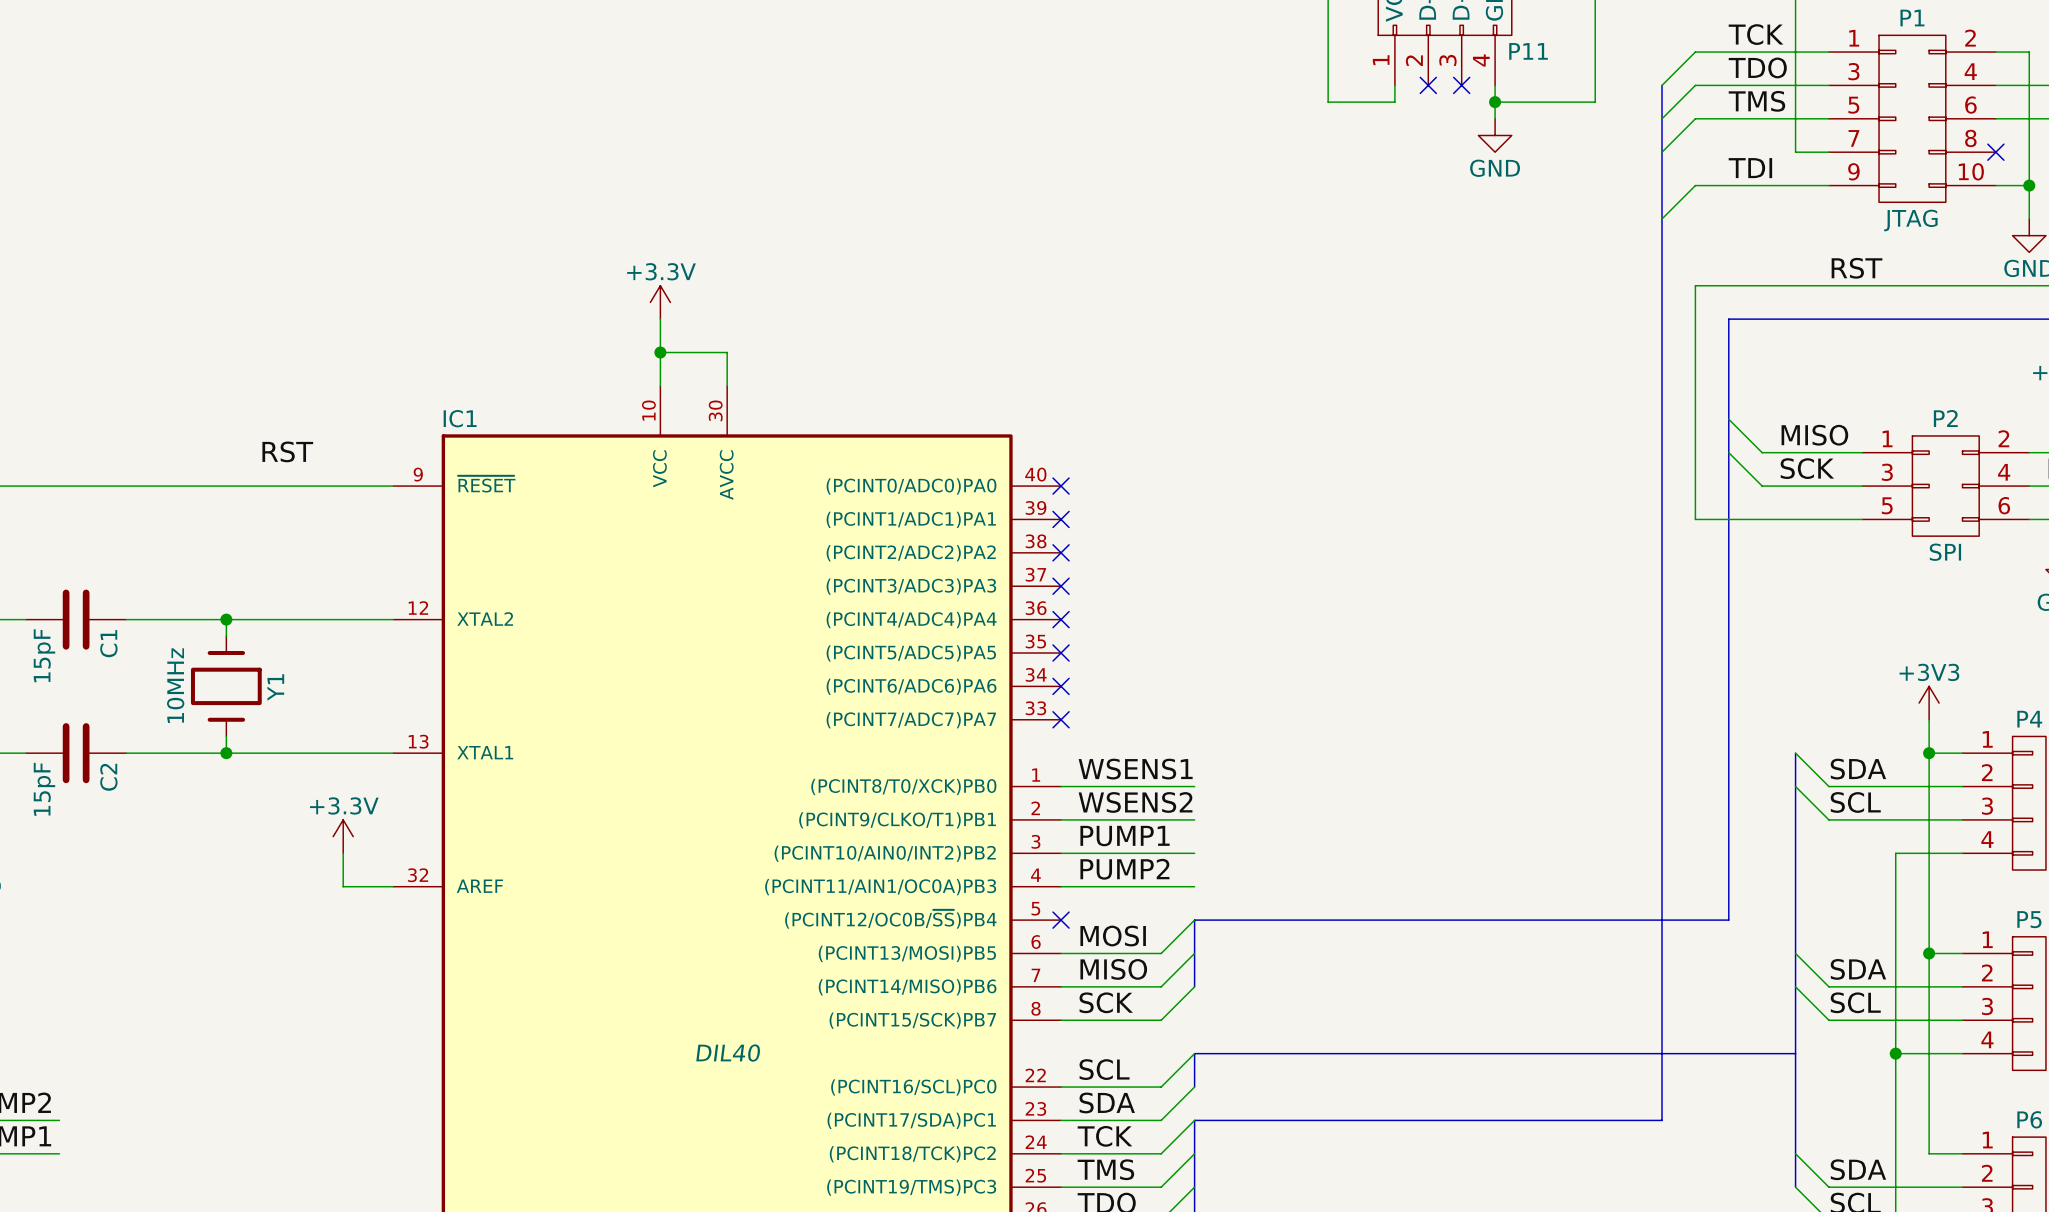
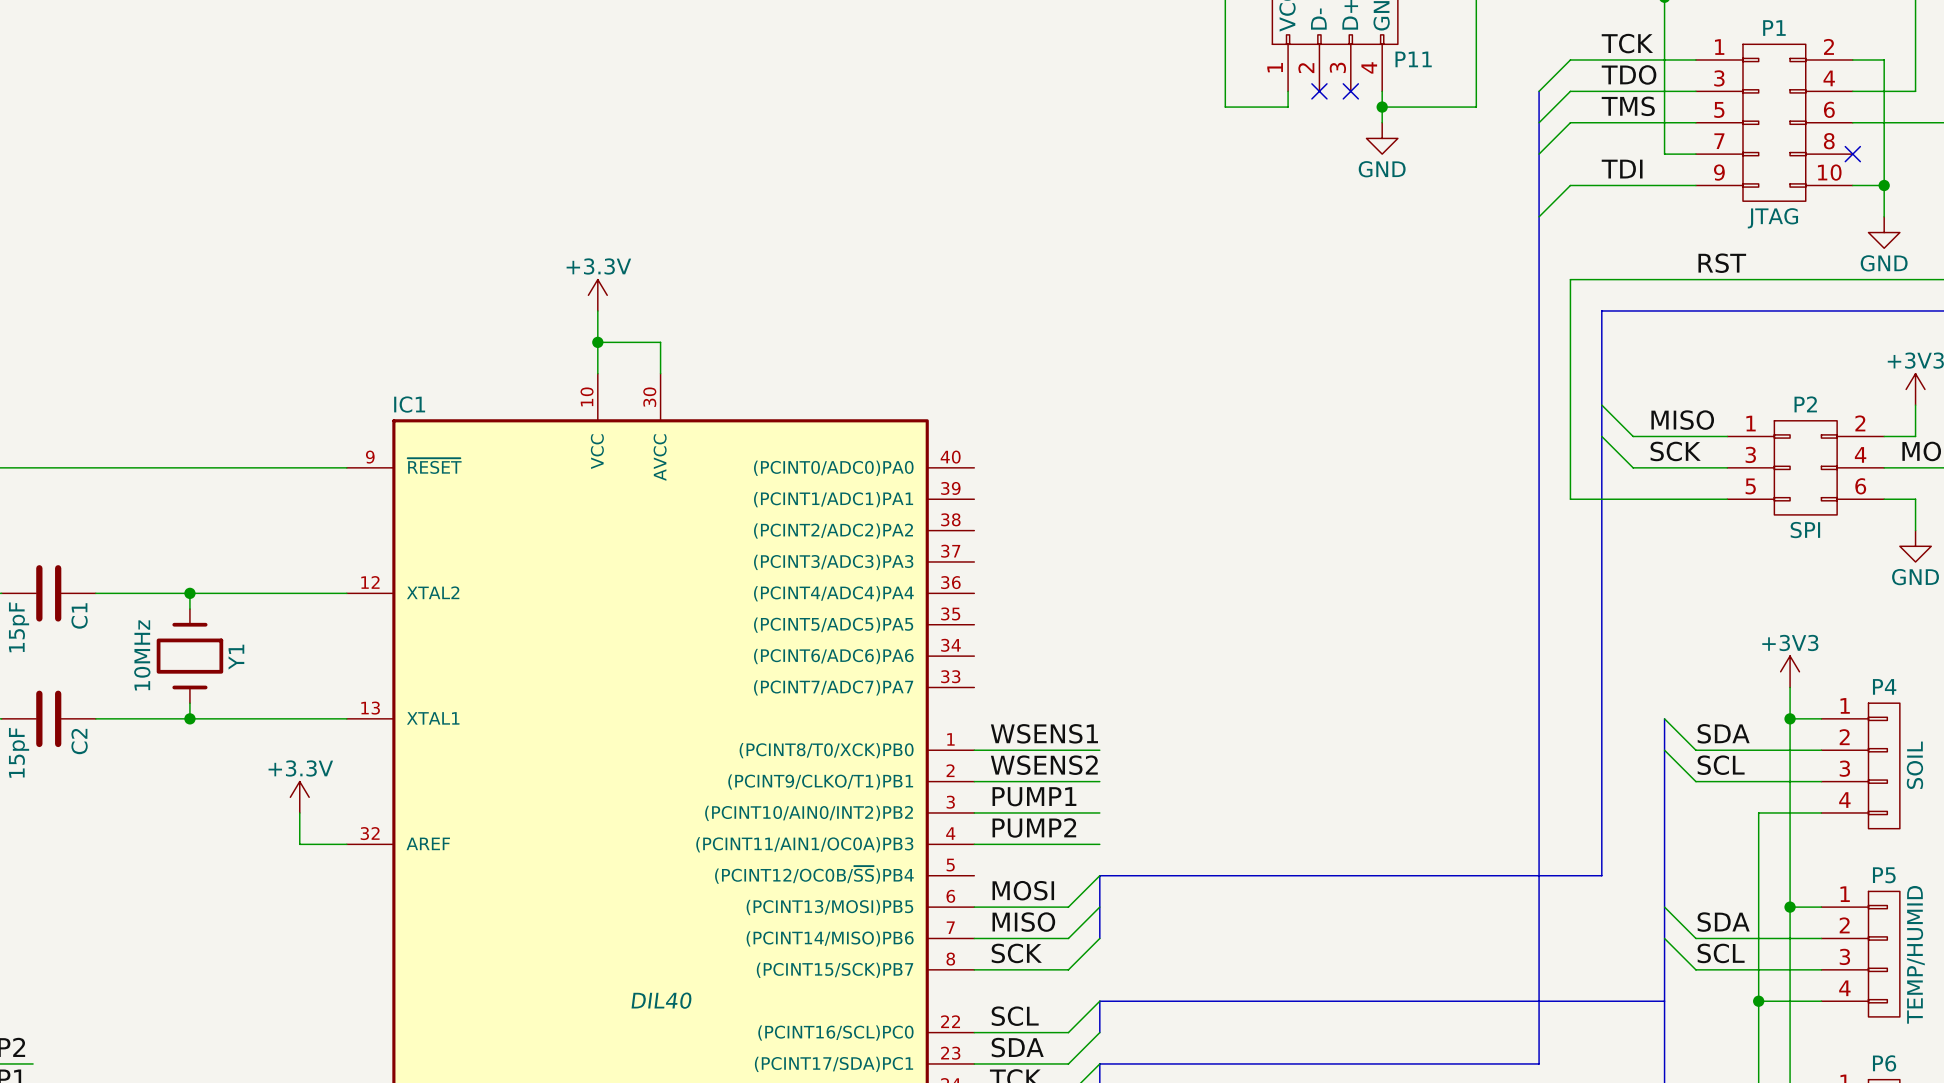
label: RST (287, 451) -> none
no-connect mark: (1061, 486) -> none
no-connect mark: (1061, 519) -> none
no-connect mark: (1061, 552) -> none
no-connect mark: (1061, 586) -> none
no-connect mark: (1061, 619) -> none
no-connect mark: (1061, 653) -> none
no-connect mark: (1061, 686) -> none
no-connect mark: (1061, 719) -> none
no-connect mark: (1061, 920) -> none

